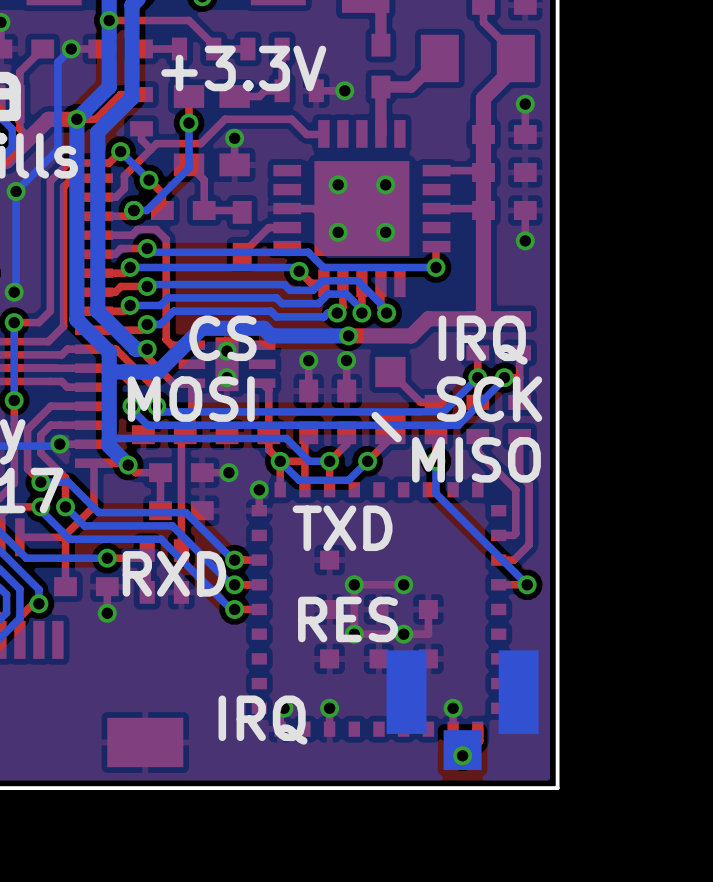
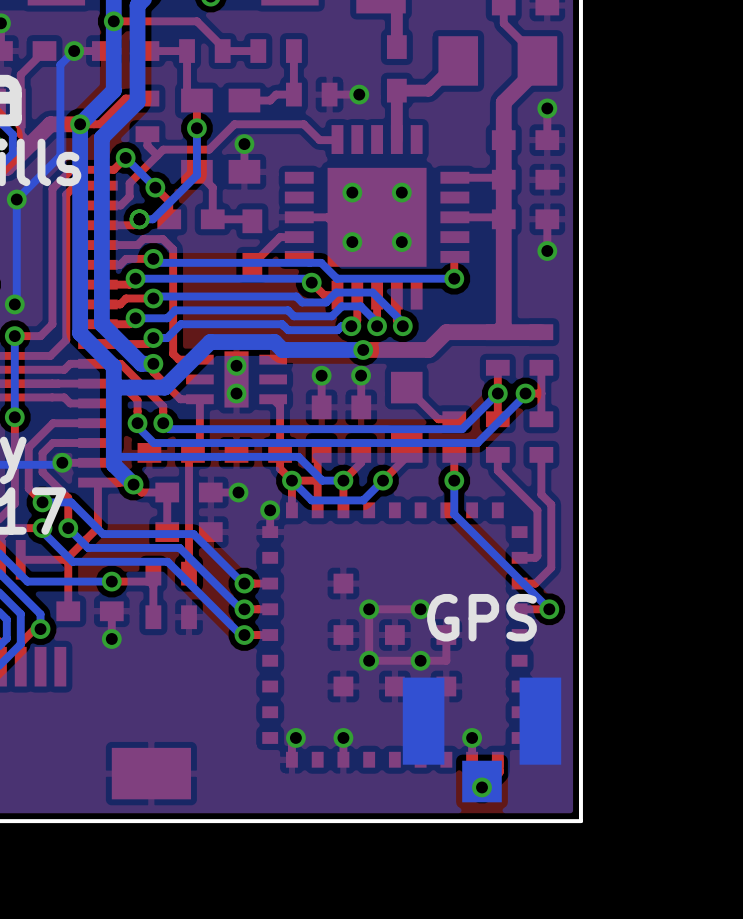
text: +3.3V (243, 68) -> none
text: CS (222, 338) -> none
text: IRQ (483, 340) -> none
text: MOSI (191, 399) -> none
text: SCK (489, 399) -> none
line: (375, 415) (398, 438) -> none
text: MISO (476, 459) -> none
text: TXD (342, 528) -> none
text: RXD (174, 573) -> none
text: none -> GPS (481, 617)
text: RES (348, 619) -> none
text: IRQ (263, 720) -> none

